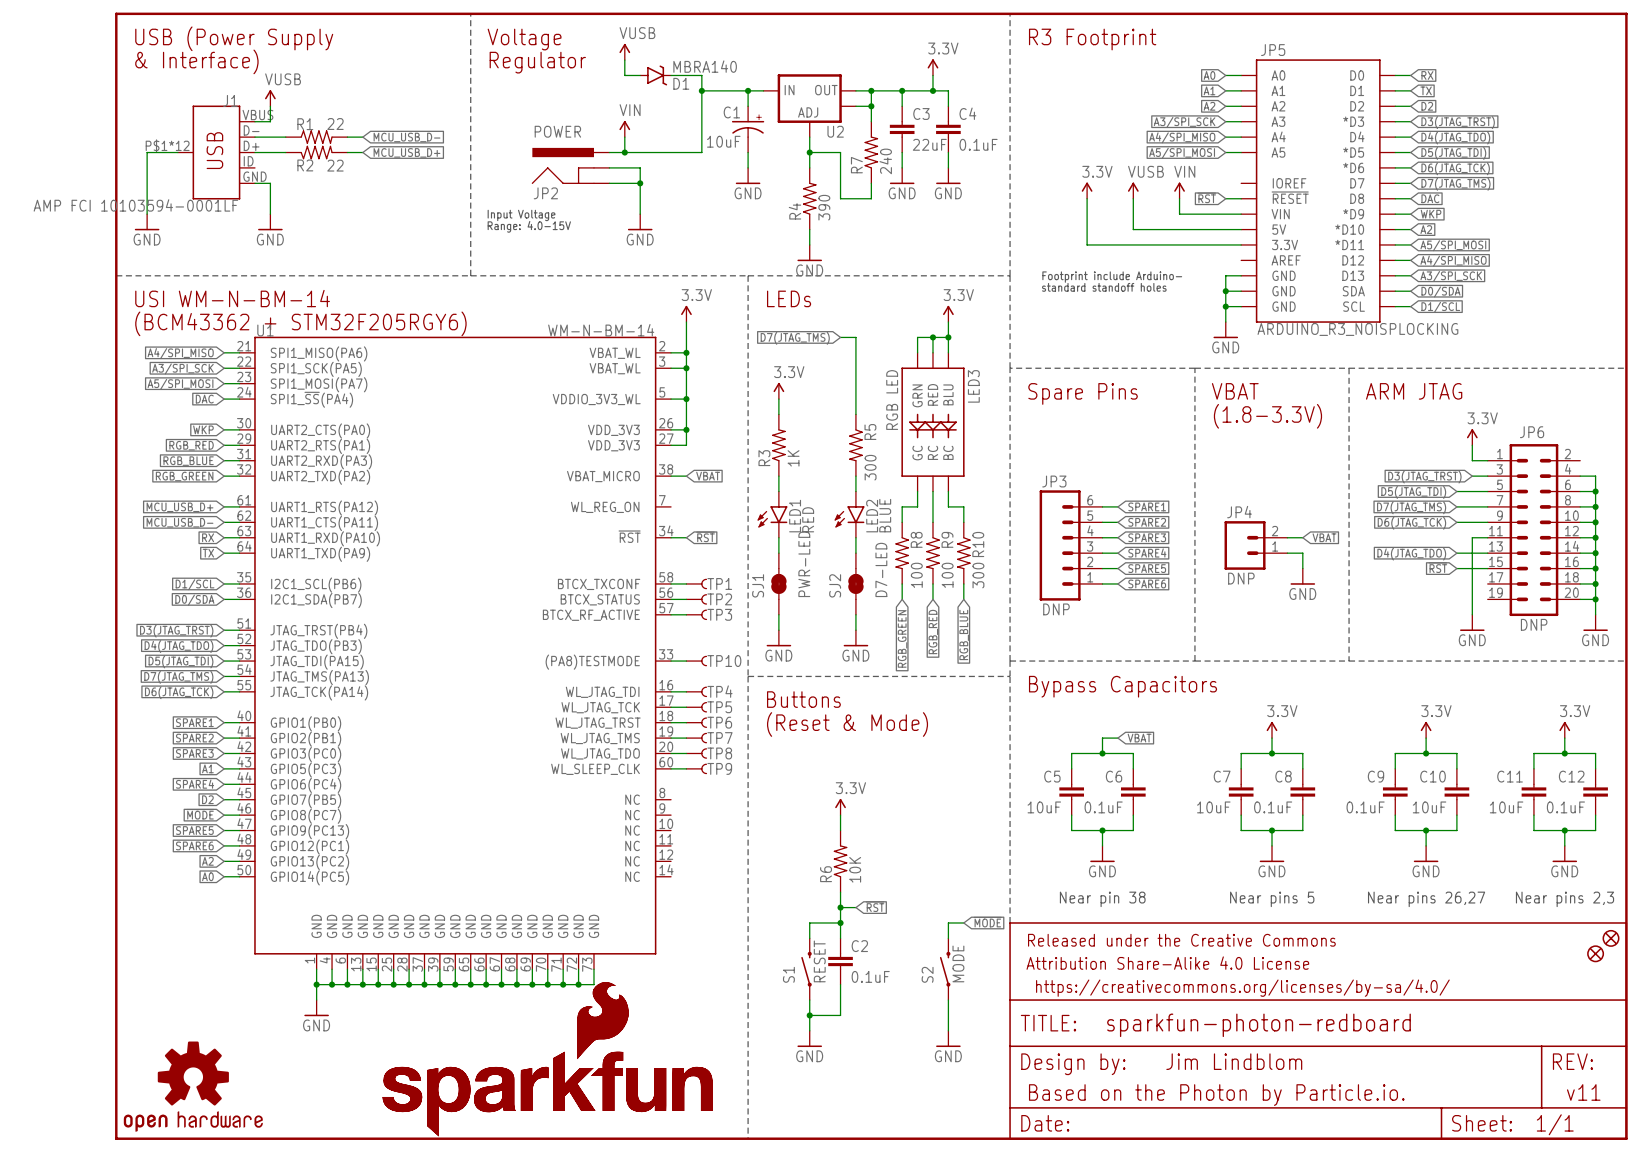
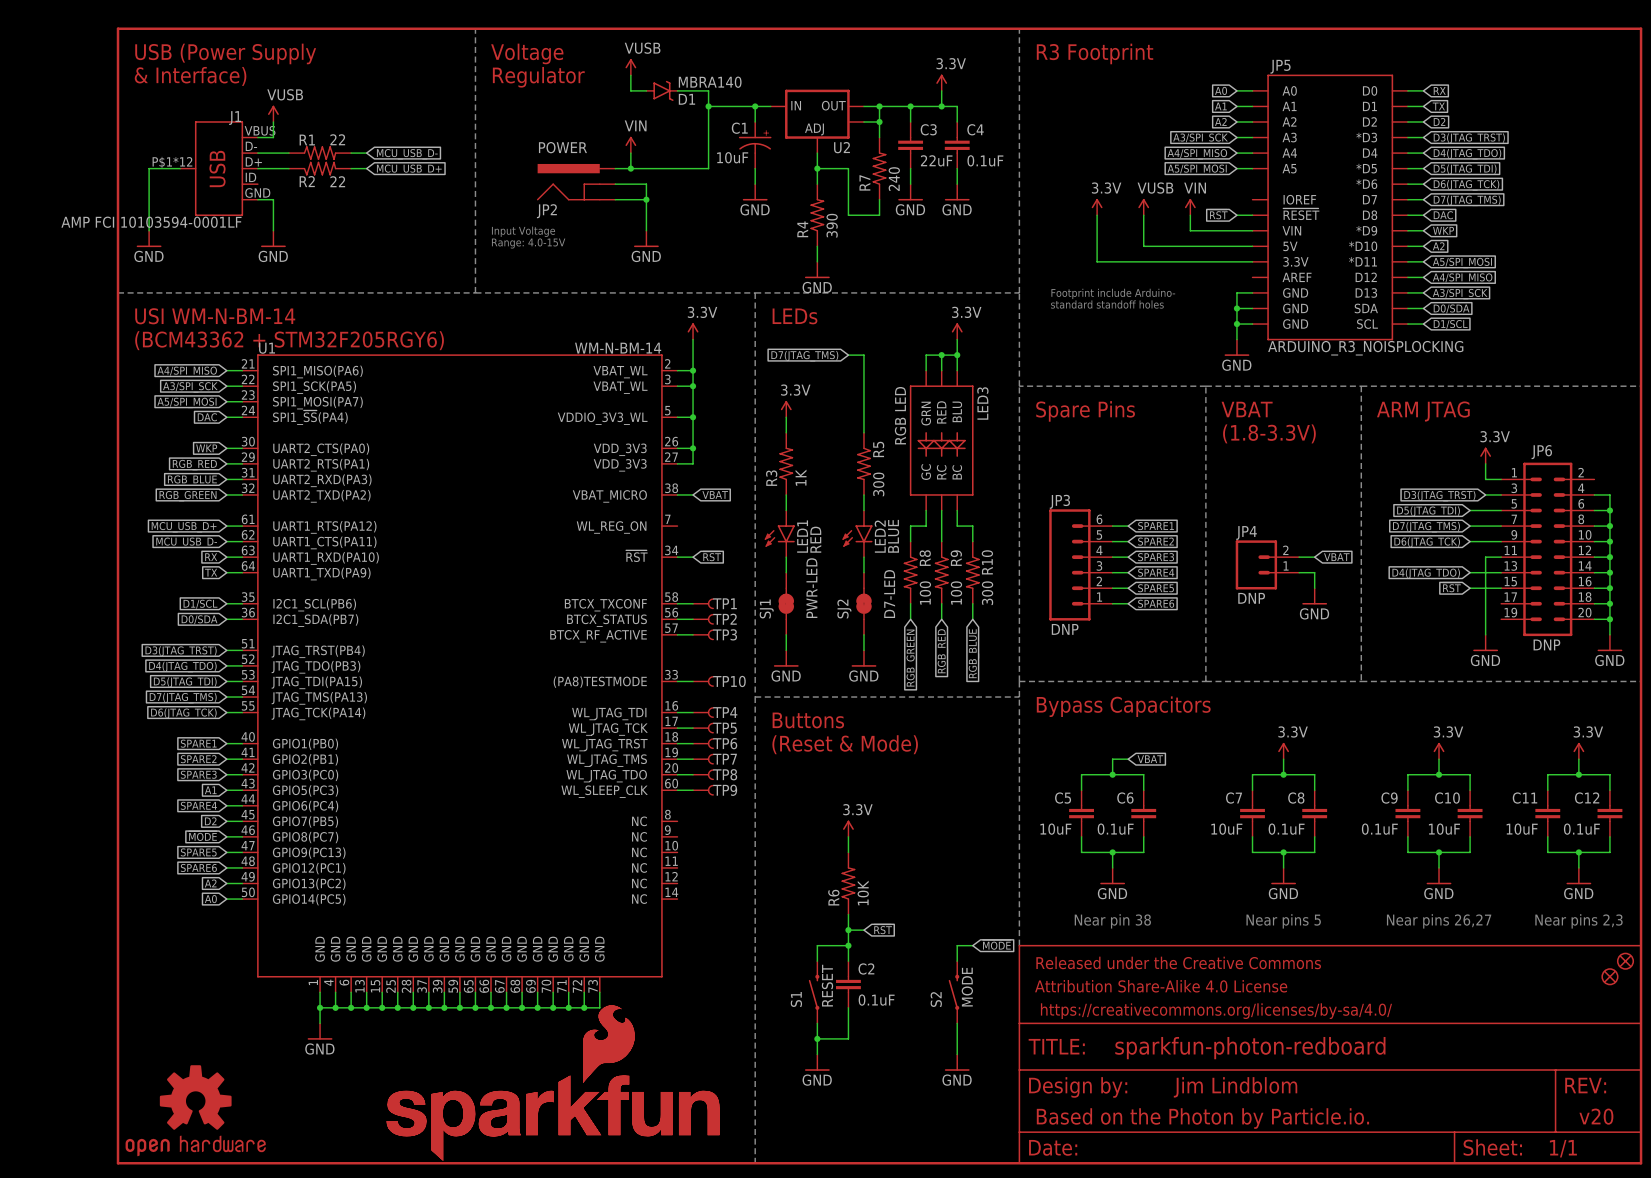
text: v11 (1583, 1092) -> v20 (1596, 1116)

